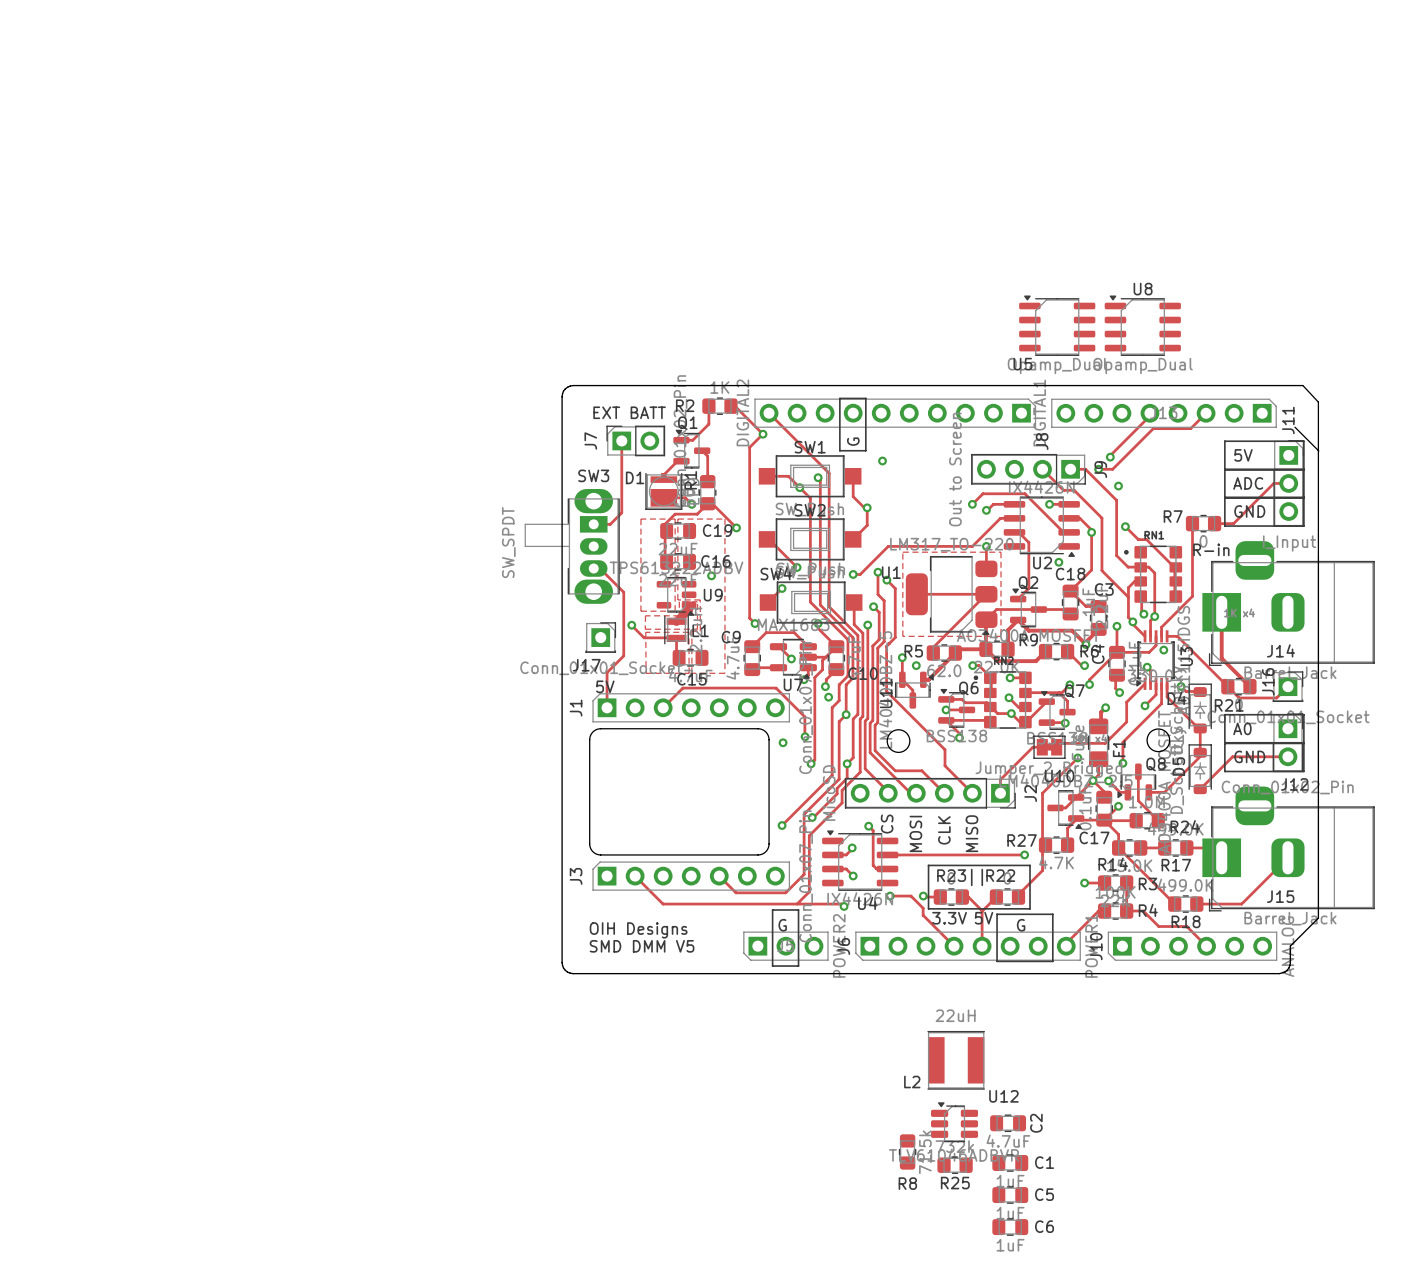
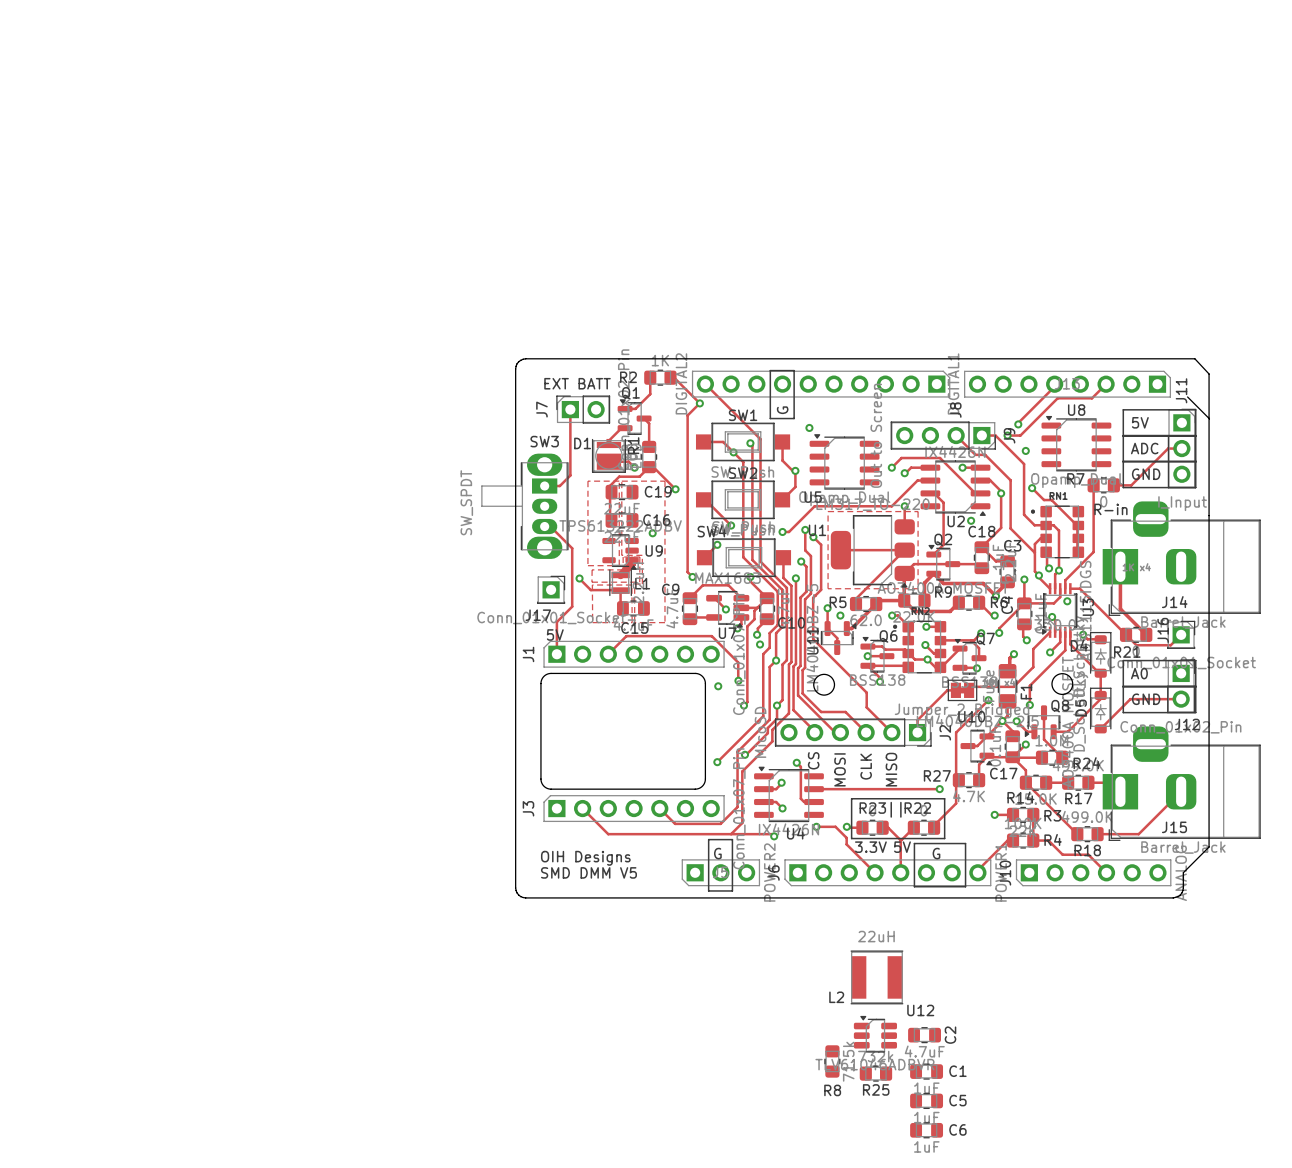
U5 position: (1057, 325) -> (844, 461)
U8 position: (1142, 325) -> (1076, 443)

